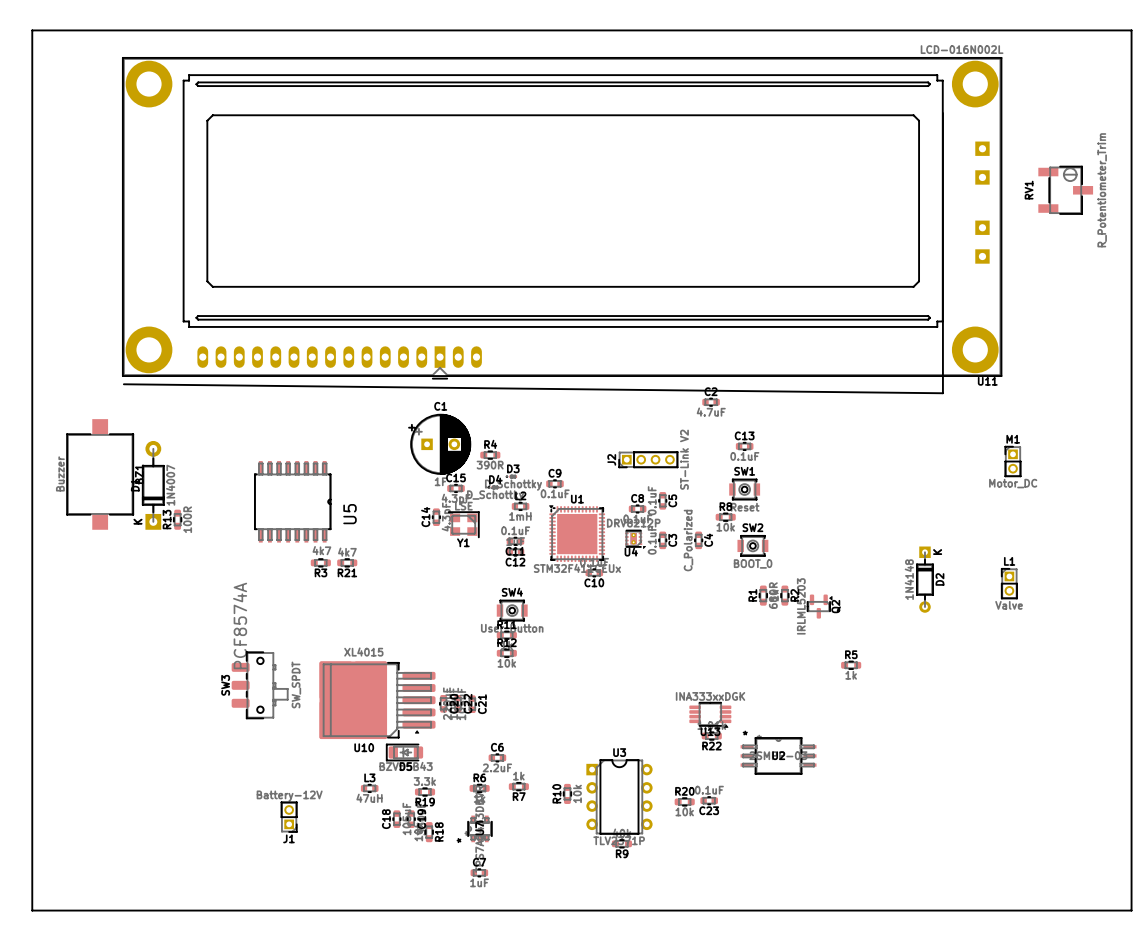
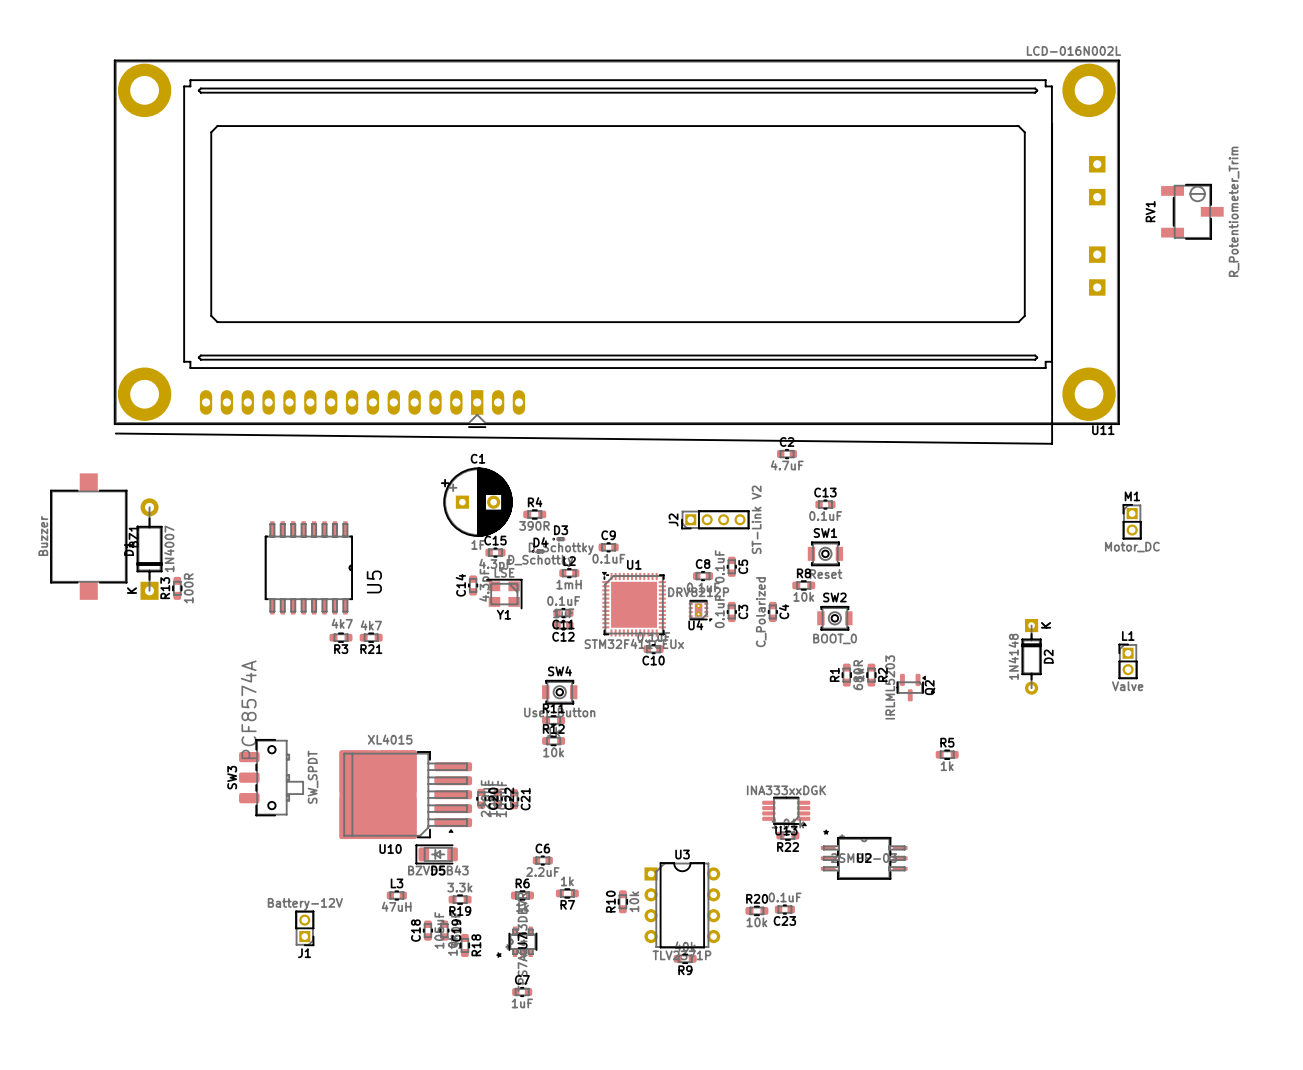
board edge: (32, 30) (1131, 30) (1131, 910) (32, 910) (32, 30) -> none

